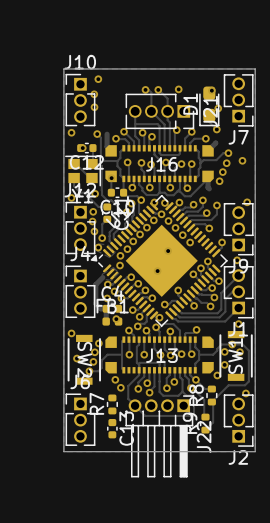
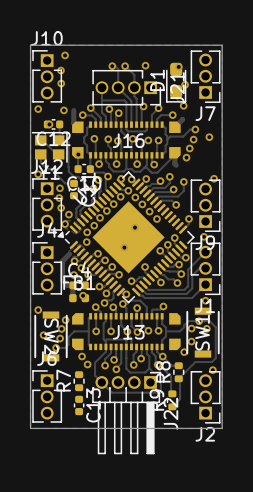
track: (97, 134) (100, 137) (100, 157) (104, 161) (117, 161) -> none
via: (95, 193) -> none
track: (107, 219) (102, 224) (102, 238) -> none

